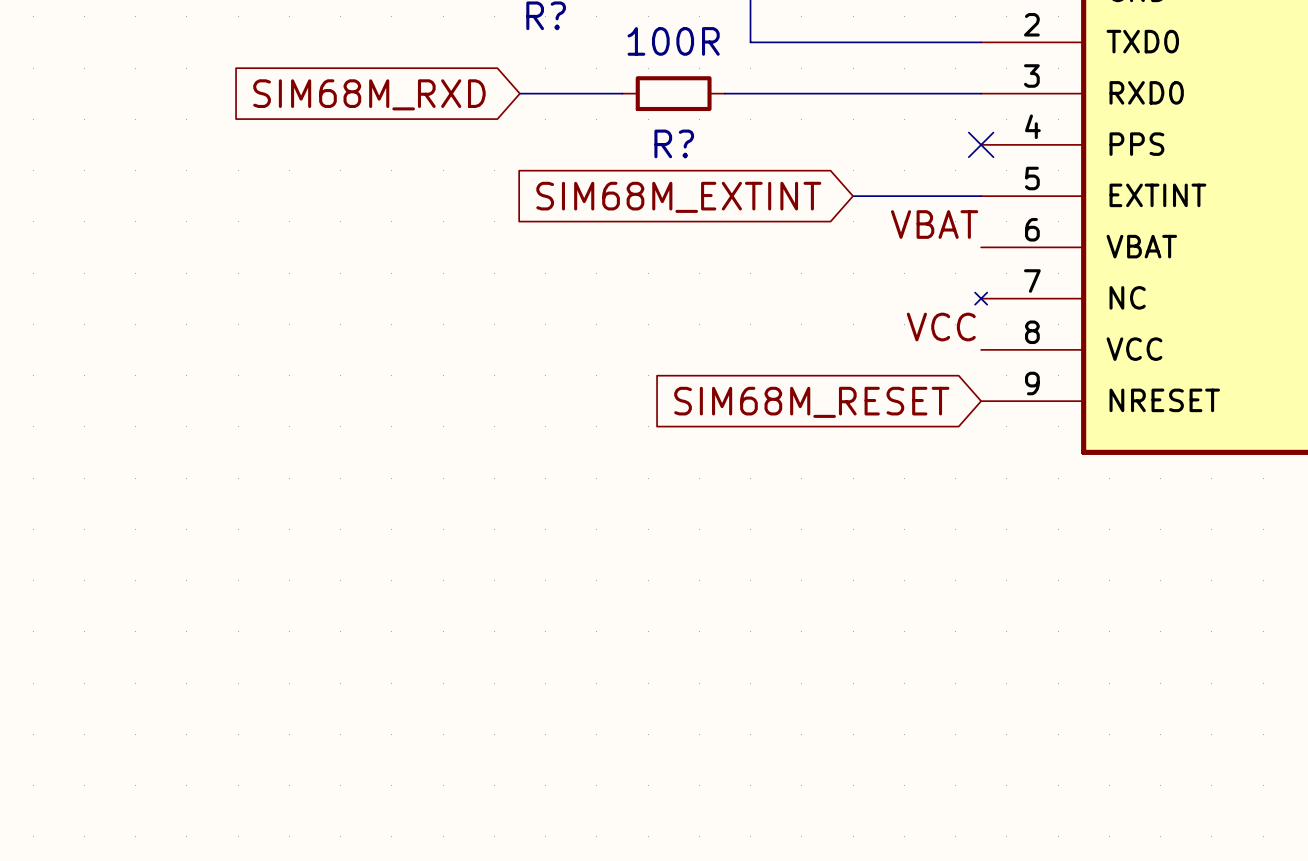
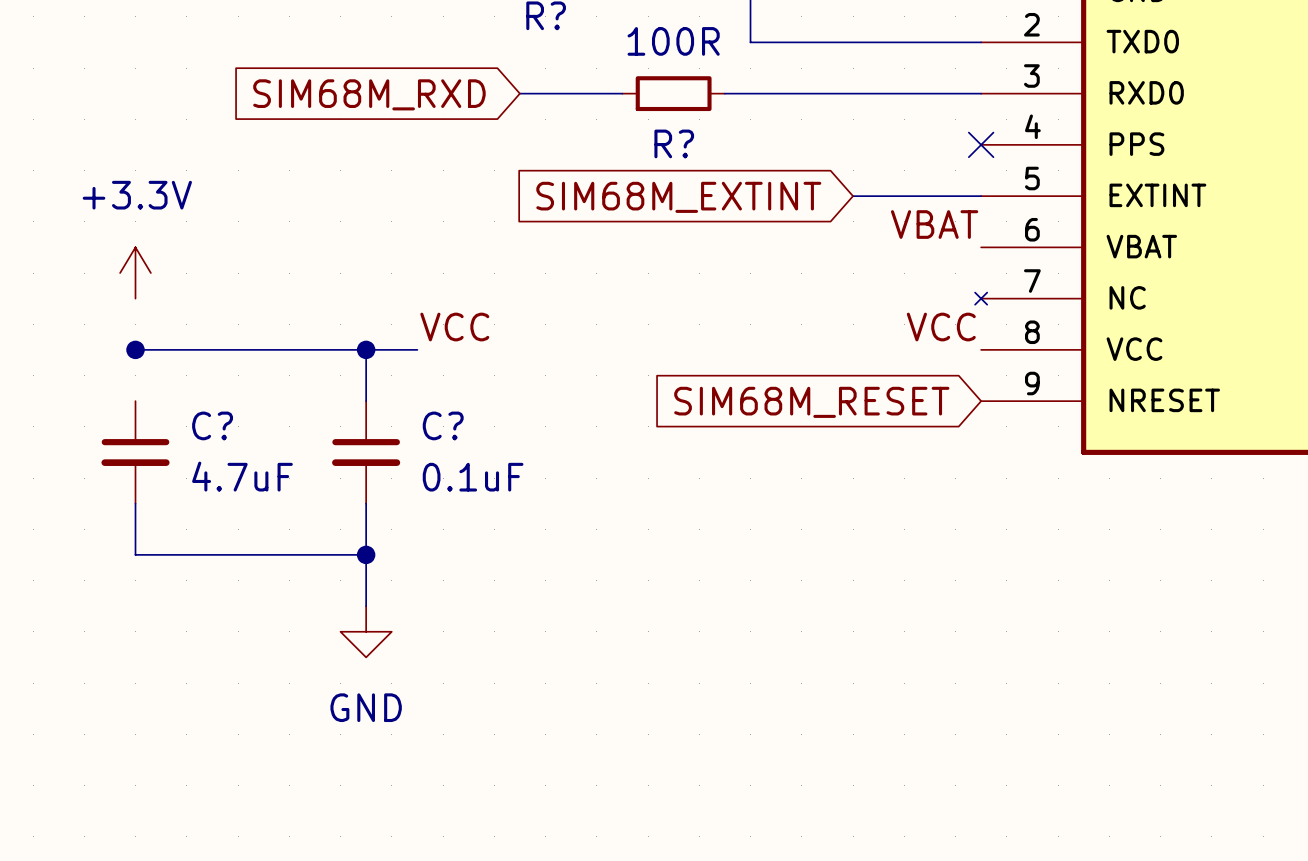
power symbol: none -> +3.3V (135, 273)
label: none -> VCC (454, 327)
wire: none -> (135, 349) (417, 349)
junction: none -> (135, 349)
wire: none -> (366, 349) (366, 401)
junction: none -> (366, 349)
C?: none -> 4.7uF (135, 452)
C?: none -> 0.1uF (366, 452)
wire: none -> (135, 503) (135, 554) (366, 554)
wire: none -> (366, 503) (366, 606)
junction: none -> (366, 554)
power symbol: none -> GND (366, 631)

